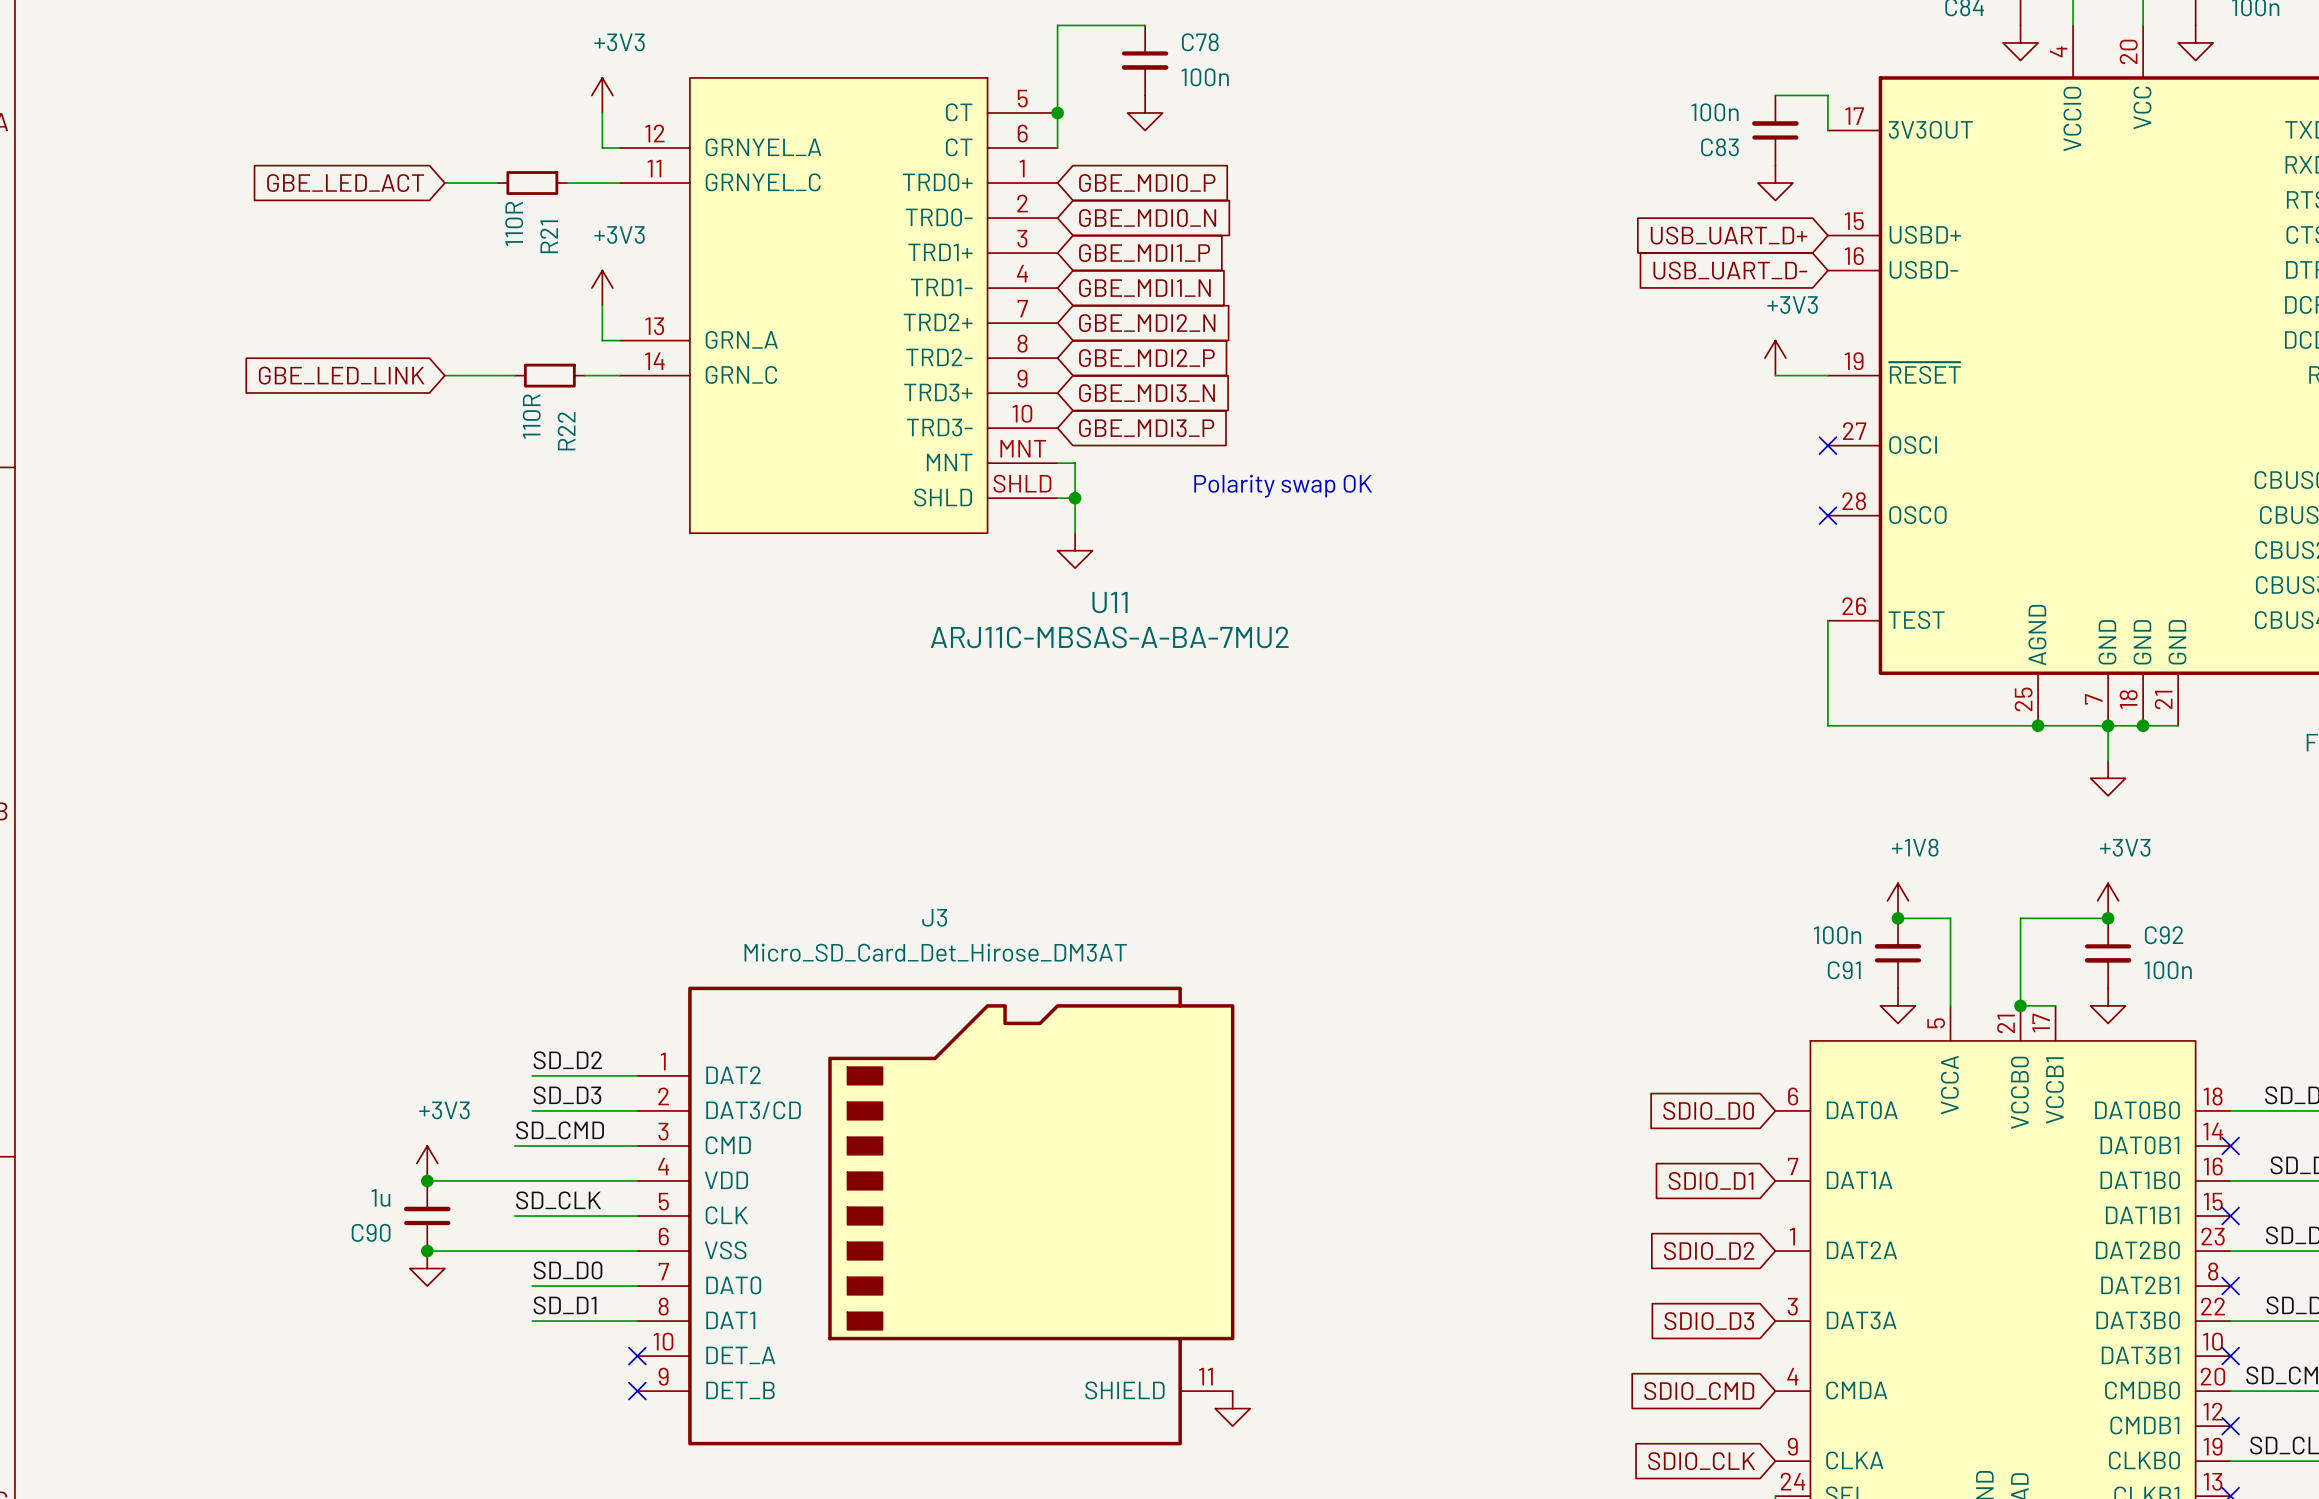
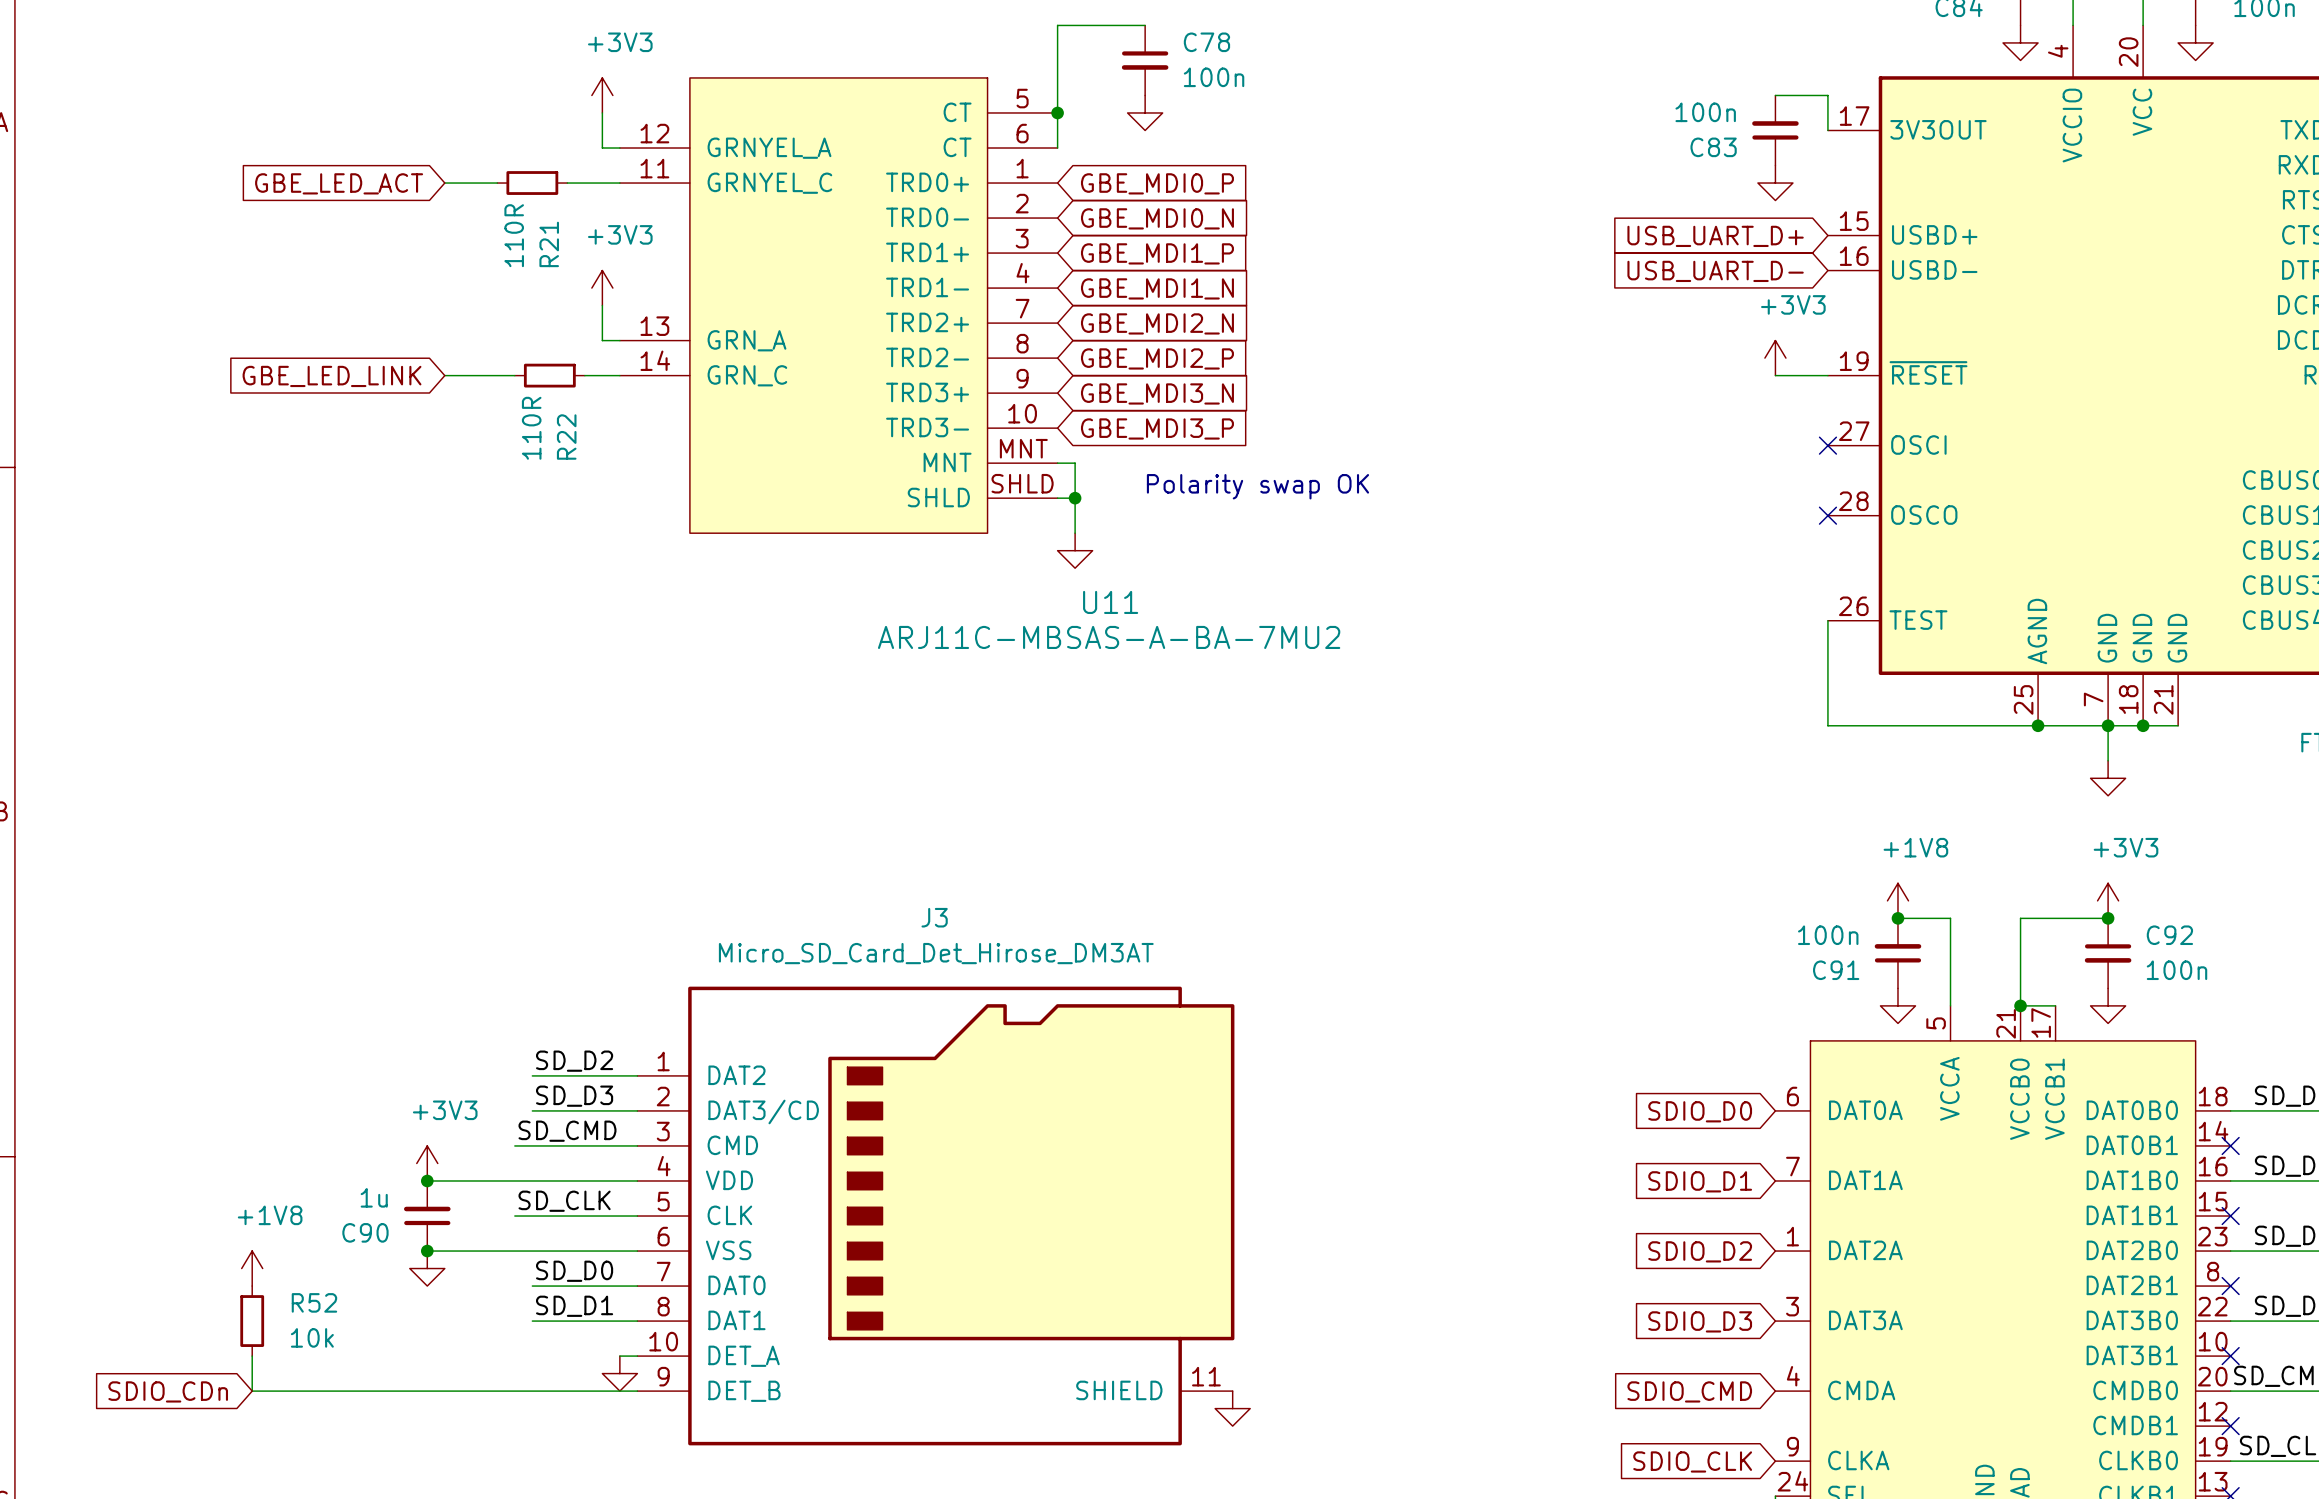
power symbol: none -> +1V8 (252, 1268)
R52: none -> 10k (252, 1321)
wire: none -> (252, 1356) (252, 1391) (637, 1391)
wire: none -> (619, 1356) (637, 1356)
no-connect mark: (637, 1356) -> none
power symbol: none -> (619, 1373)
global label: none -> SDIO_CDn (168, 1391)
no-connect mark: (637, 1391) -> none

